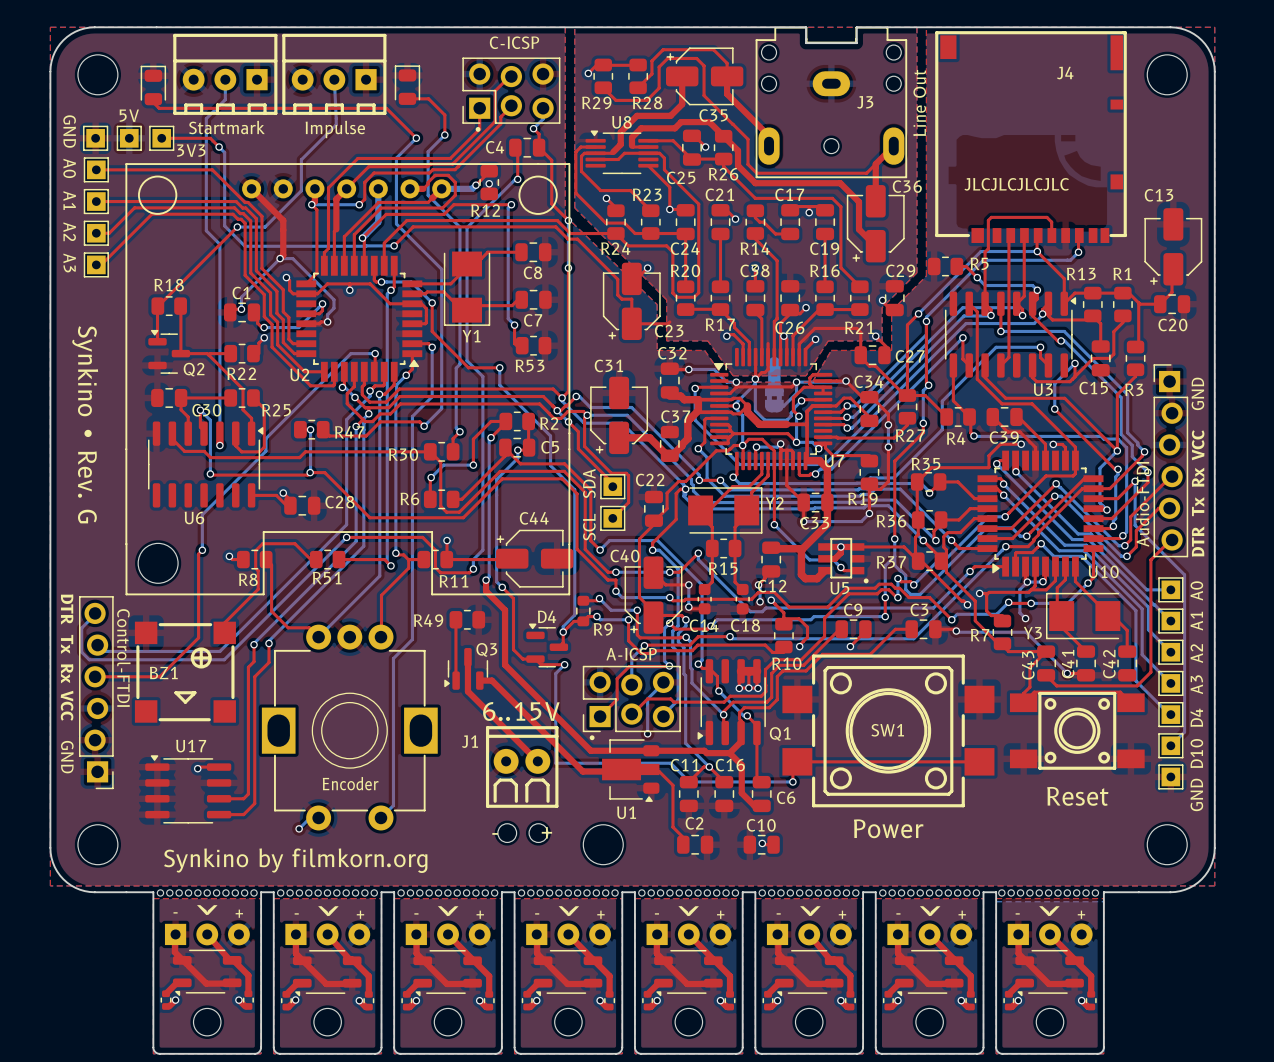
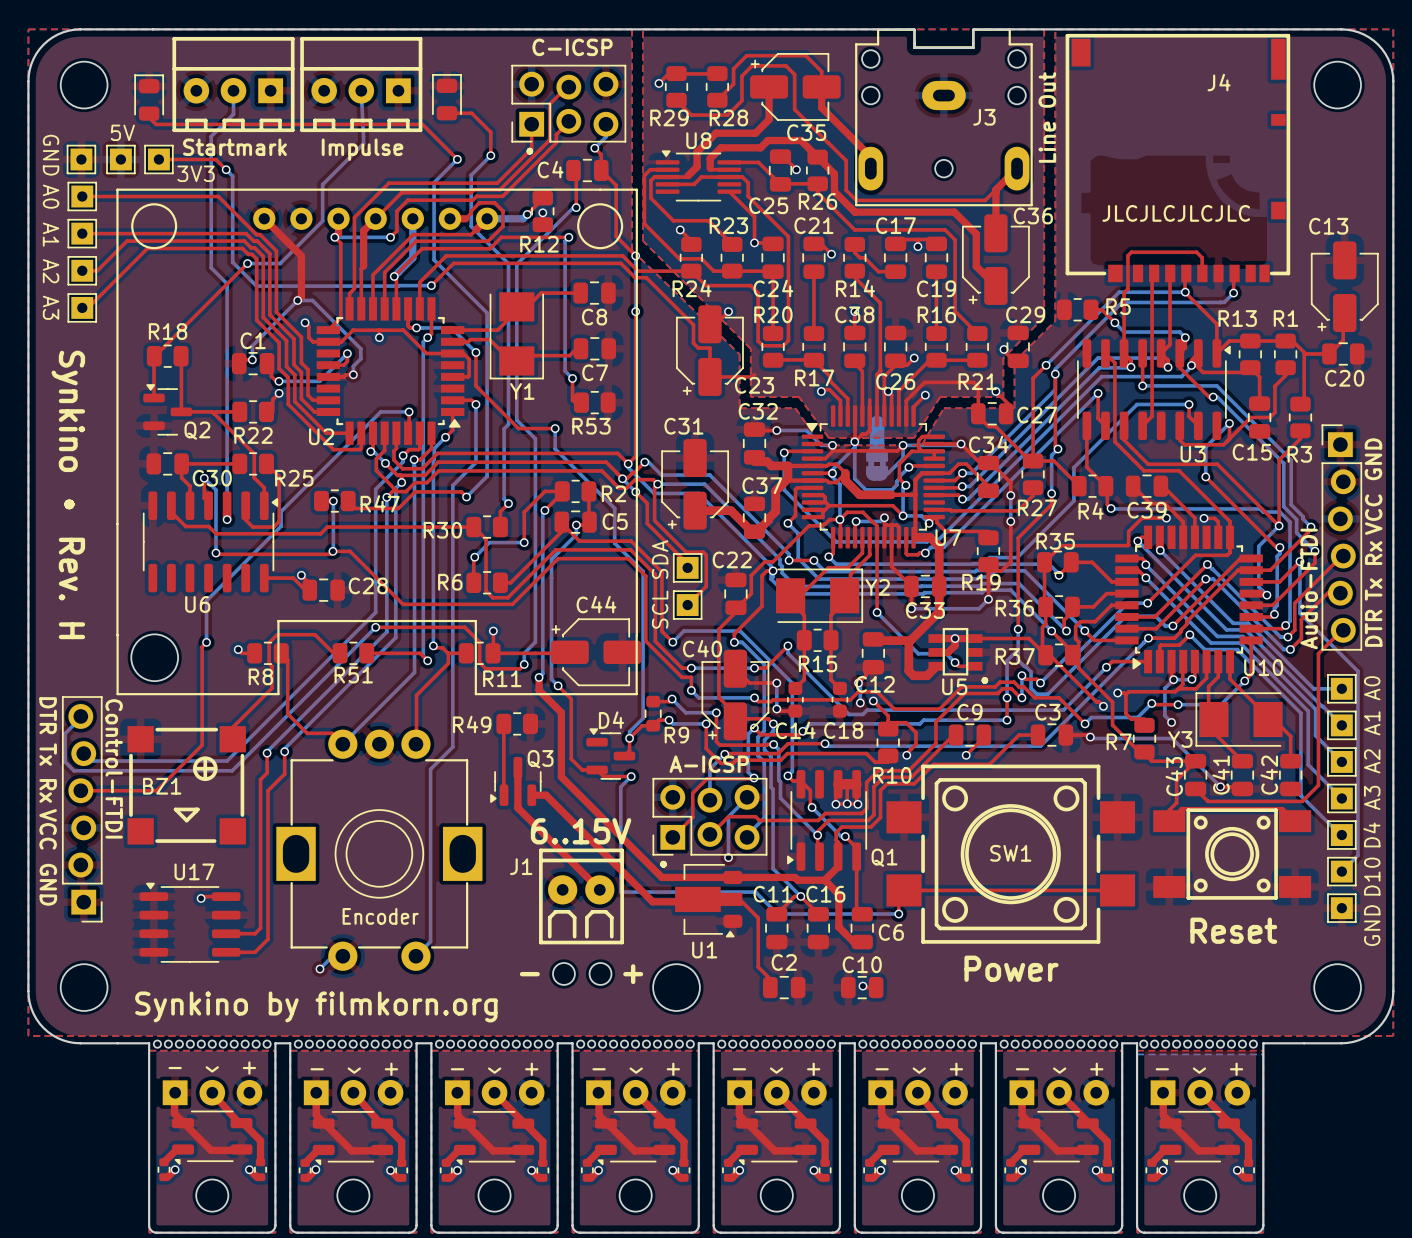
text: Synkino • Rev. G (85, 424) -> Synkino • Rev. H (68, 494)

